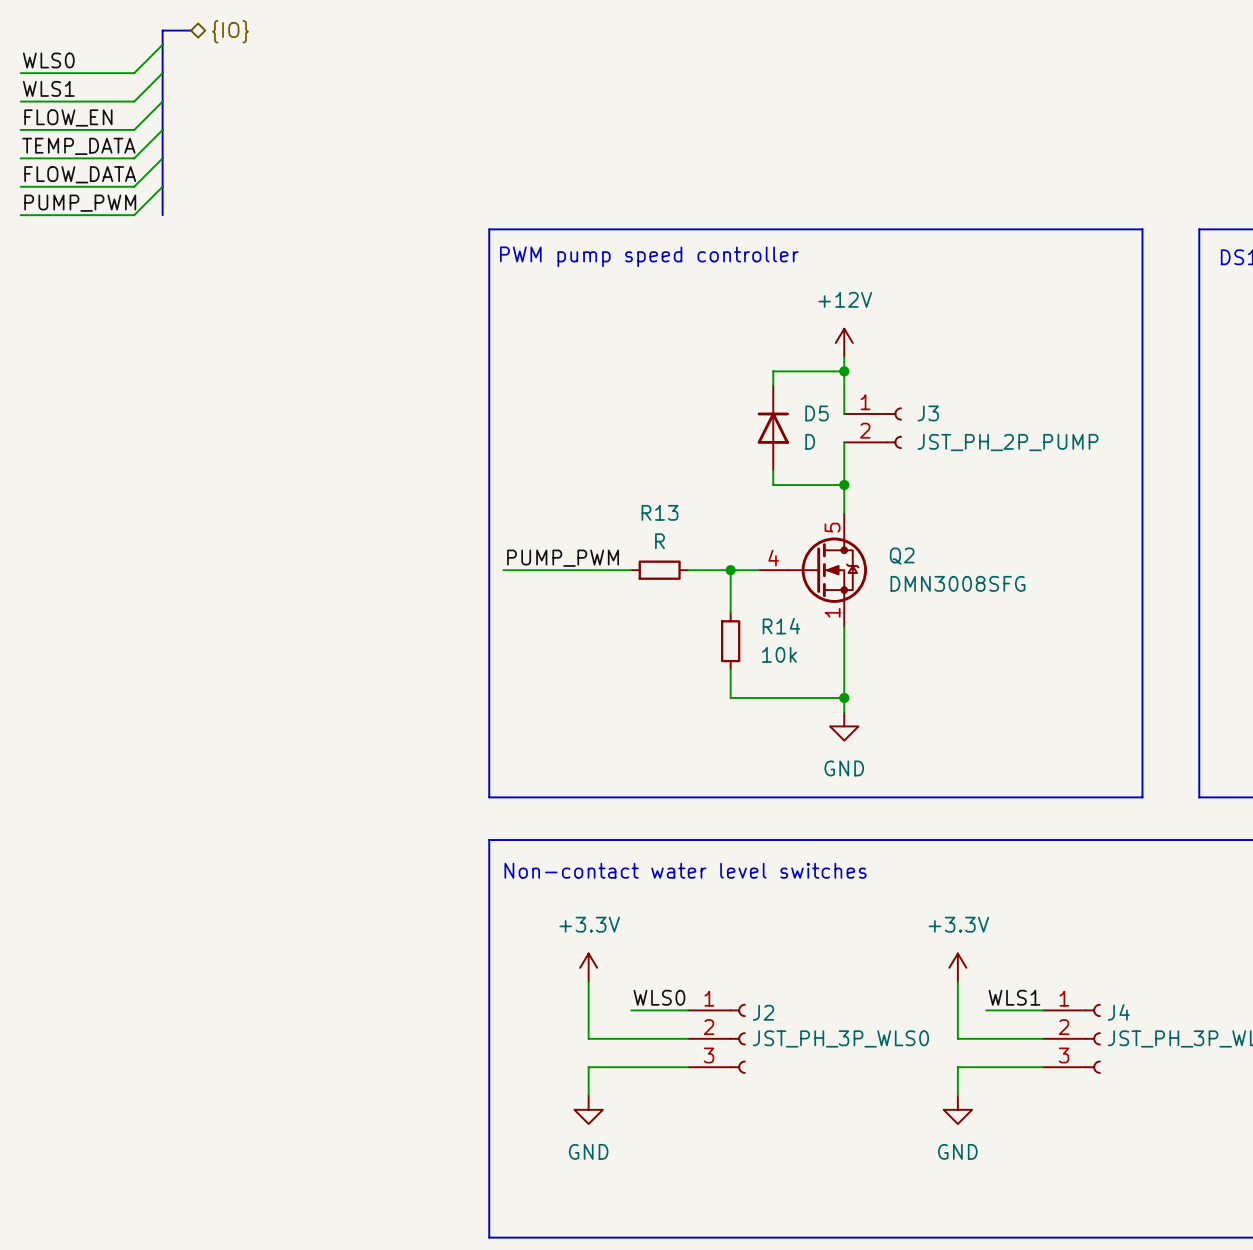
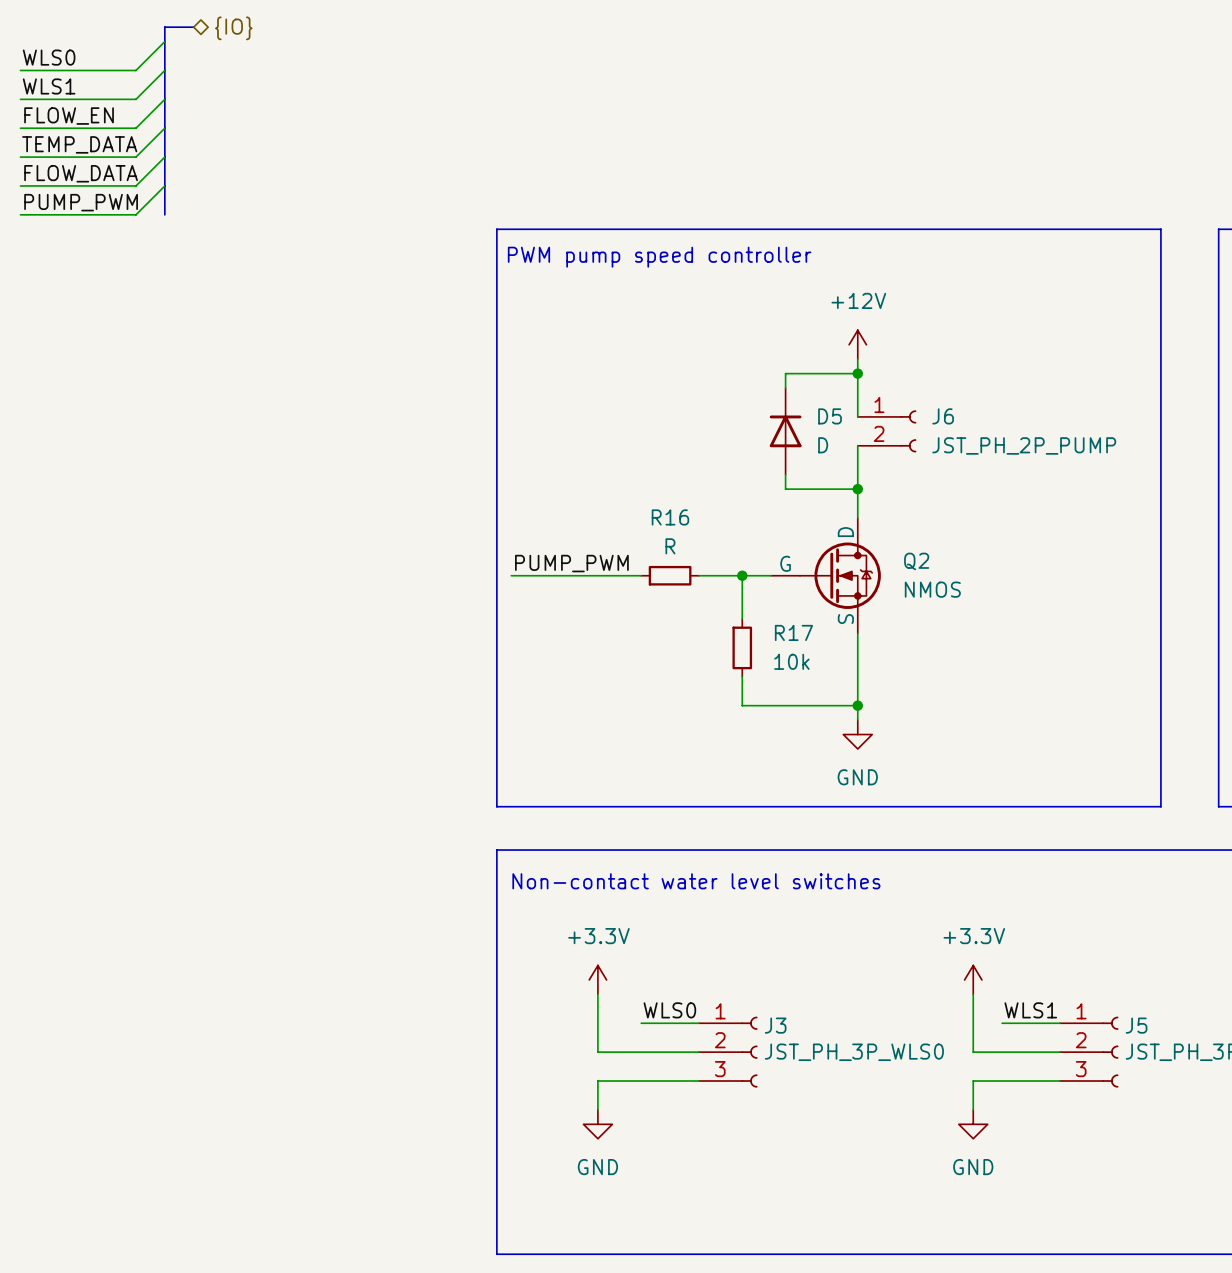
J3 name: J3 (928, 413) -> J6 (943, 416)
R13 name: R13 (659, 512) -> R16 (670, 517)
Q2 pin name: none -> D (845, 532)
Q2 pin number: 5 (832, 527) -> none
Q2 pin name: none -> G (785, 563)
Q2 pin number: 4 (773, 558) -> none
Q2 value: DMN3008SFG (957, 583) -> NMOS (932, 589)
Q2 pin name: none -> S (845, 619)
Q2 pin number: 1 (832, 612) -> none
R14 name: R14 (781, 626) -> R17 (793, 632)
J2 name: J2 (763, 1012) -> J3 (775, 1025)
J4 name: J4 (1118, 1012) -> J5 (1136, 1025)

